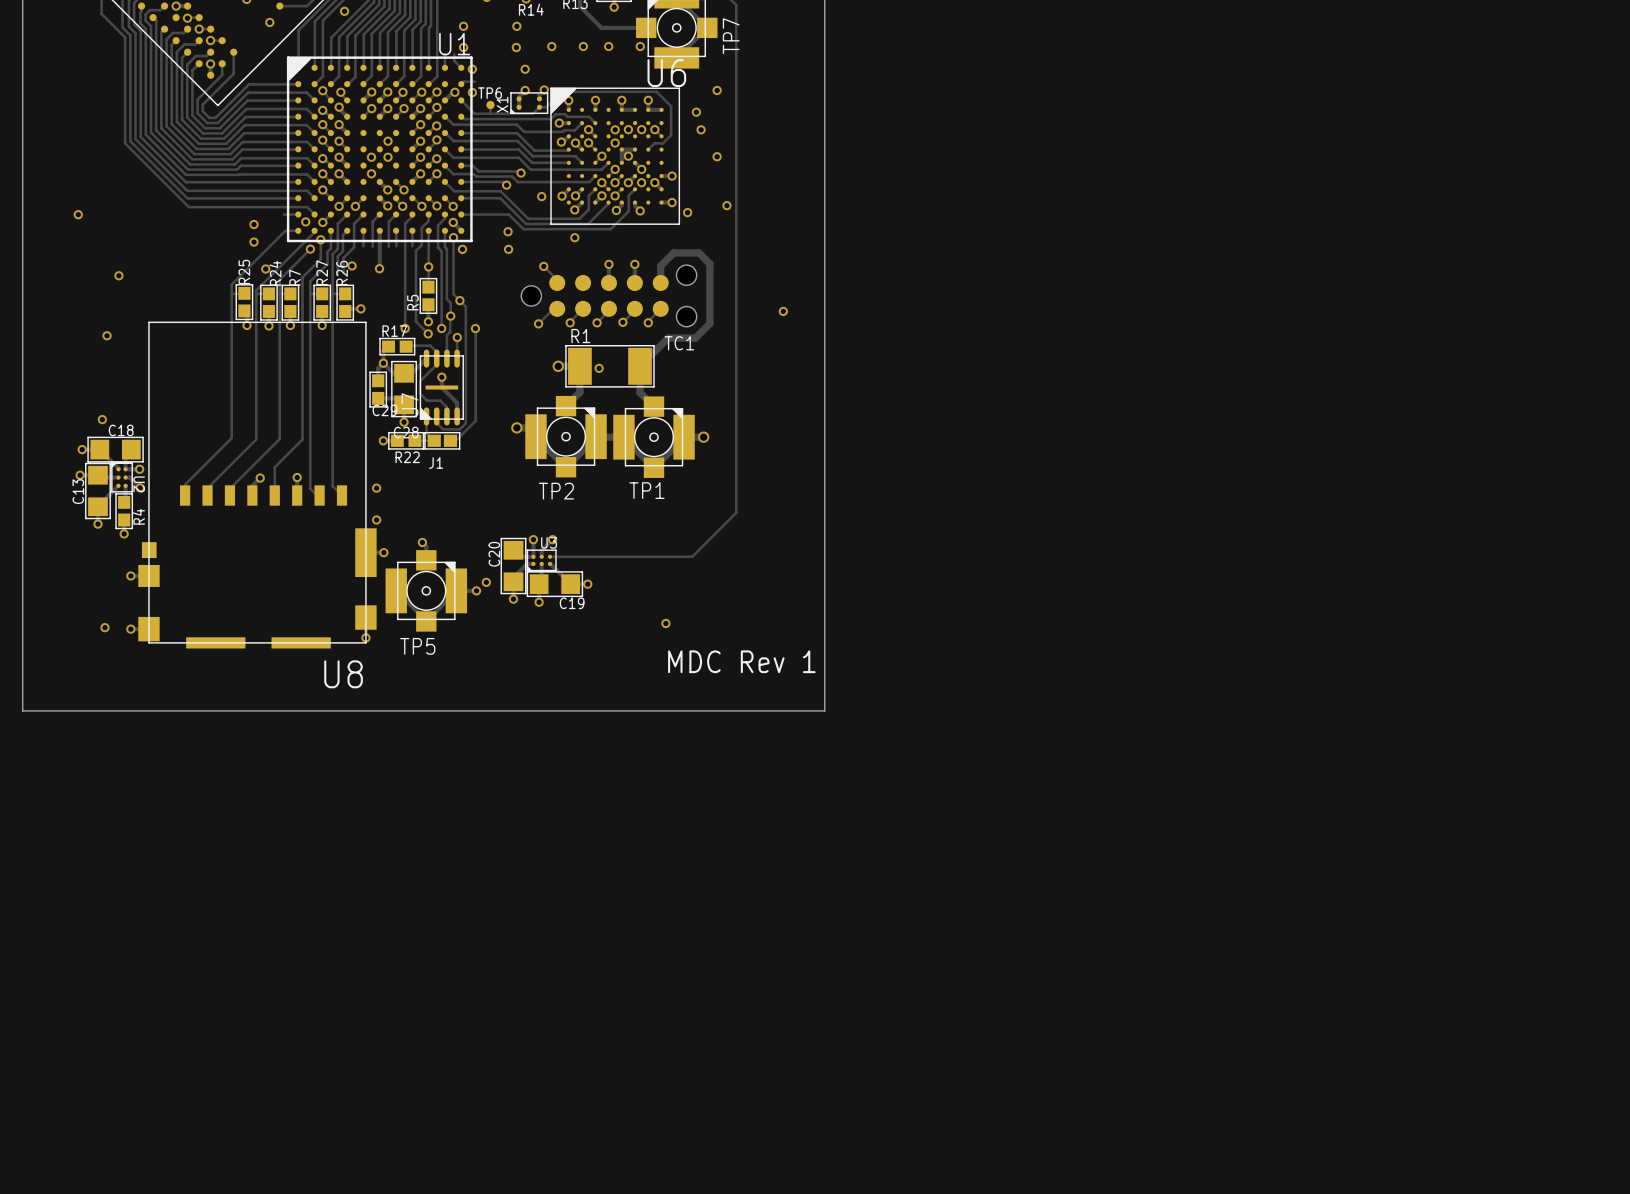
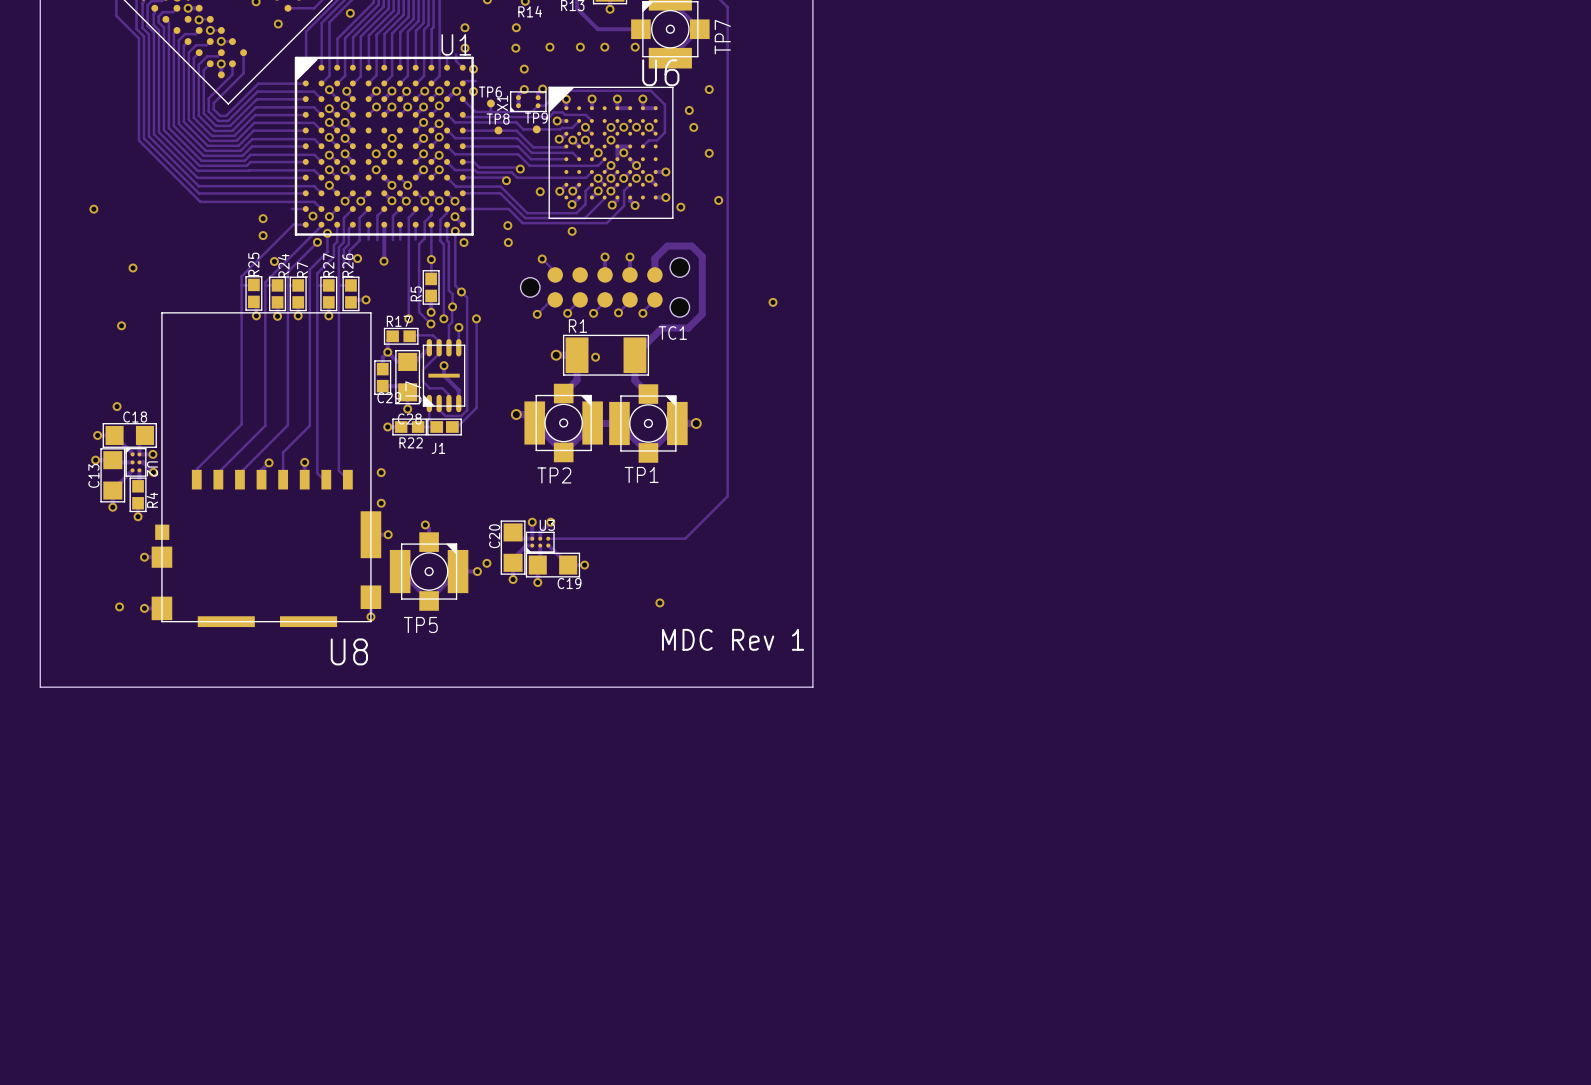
TP9: none -> (536, 129)
TP8: none -> (498, 130)

